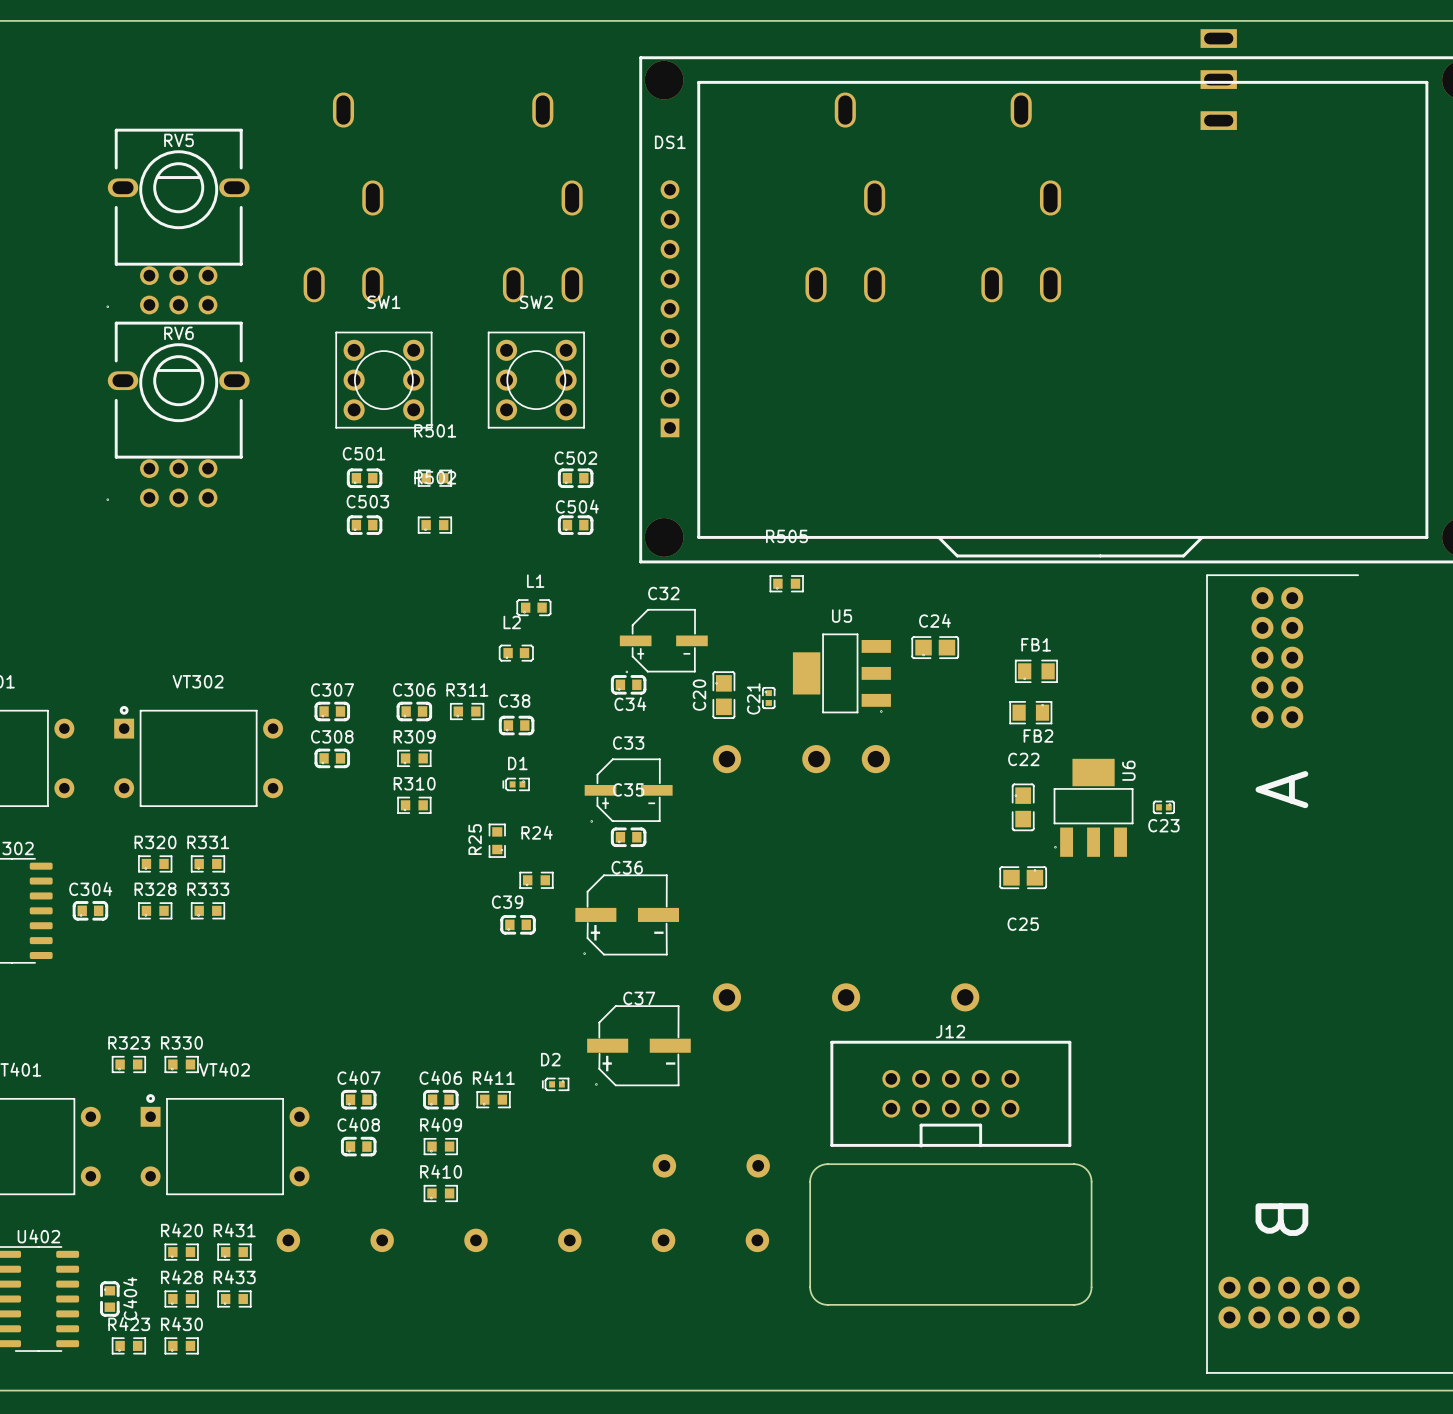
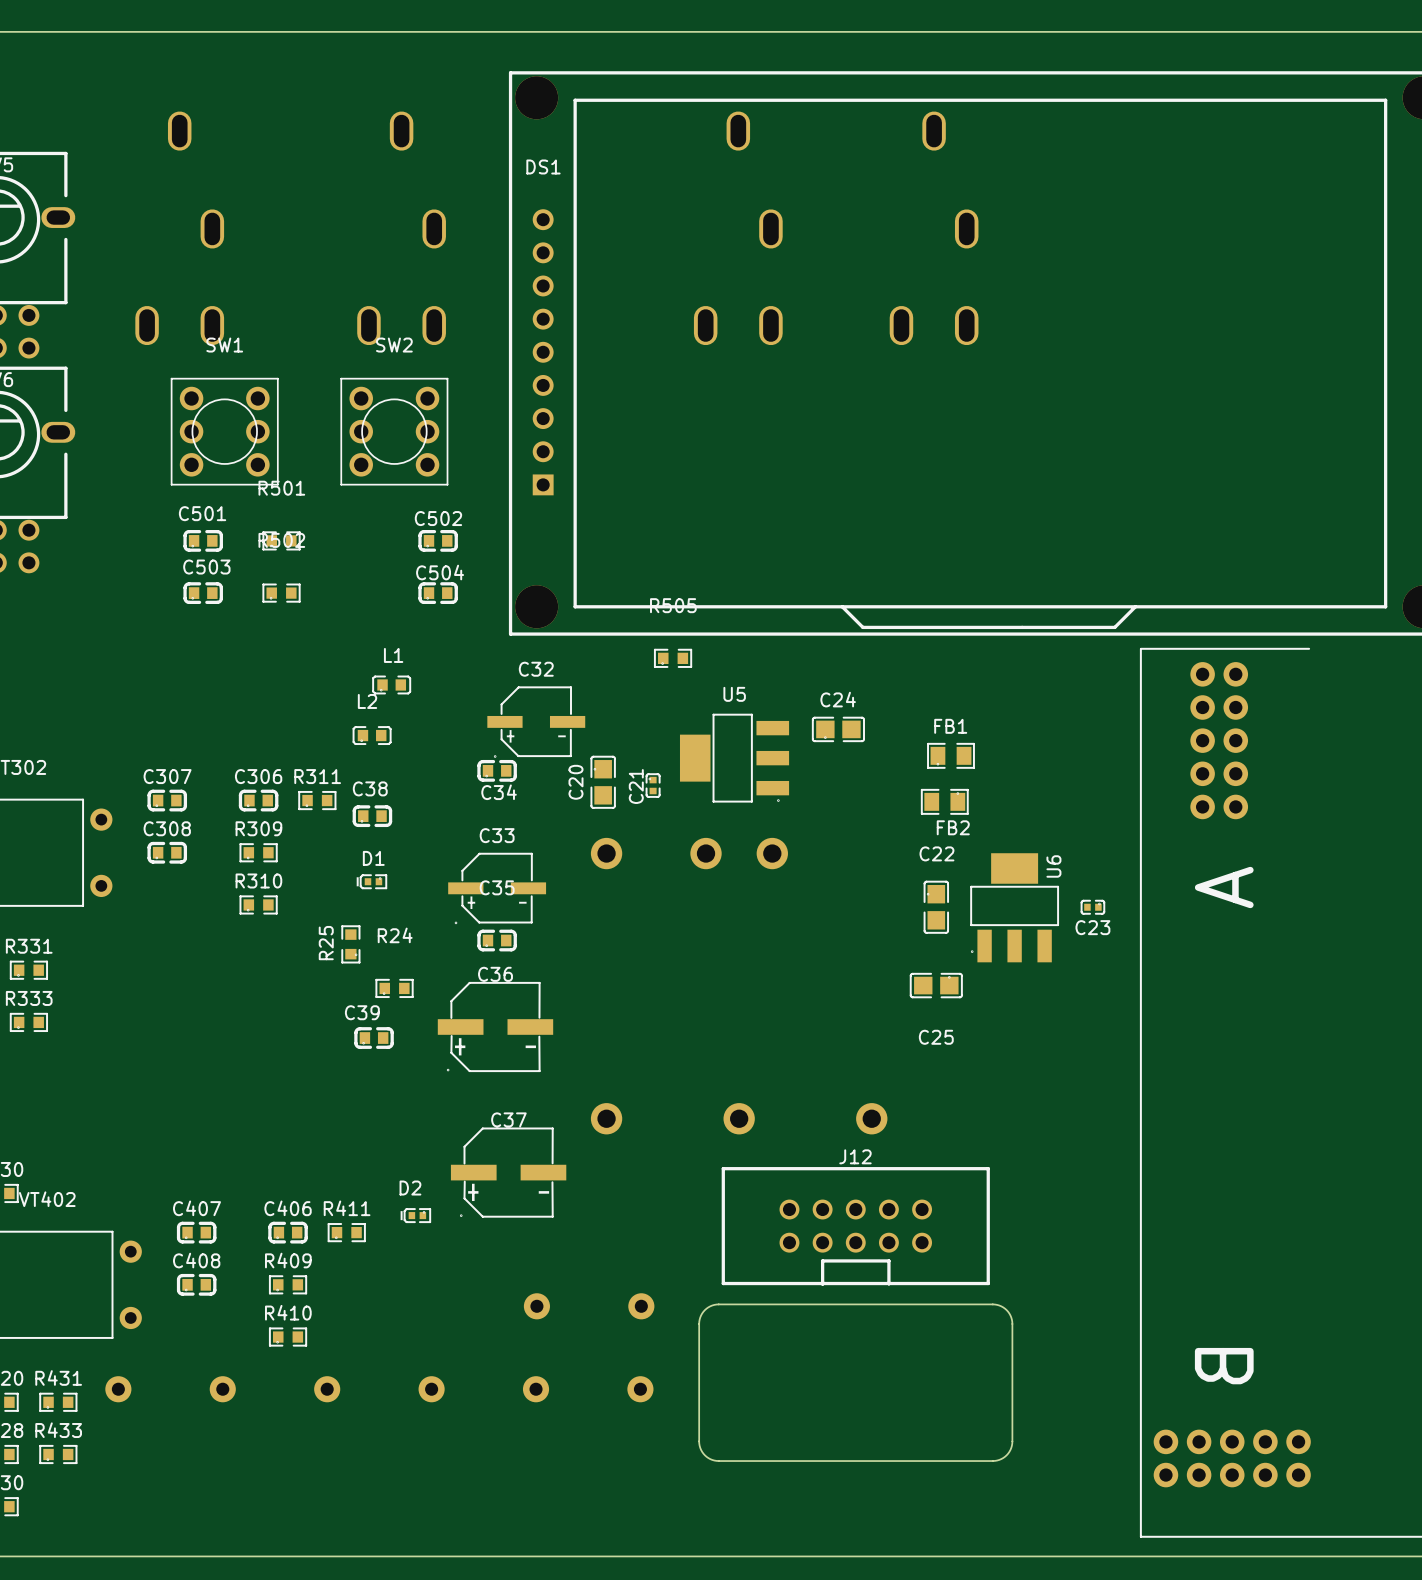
part: (1218, 79) -> none

